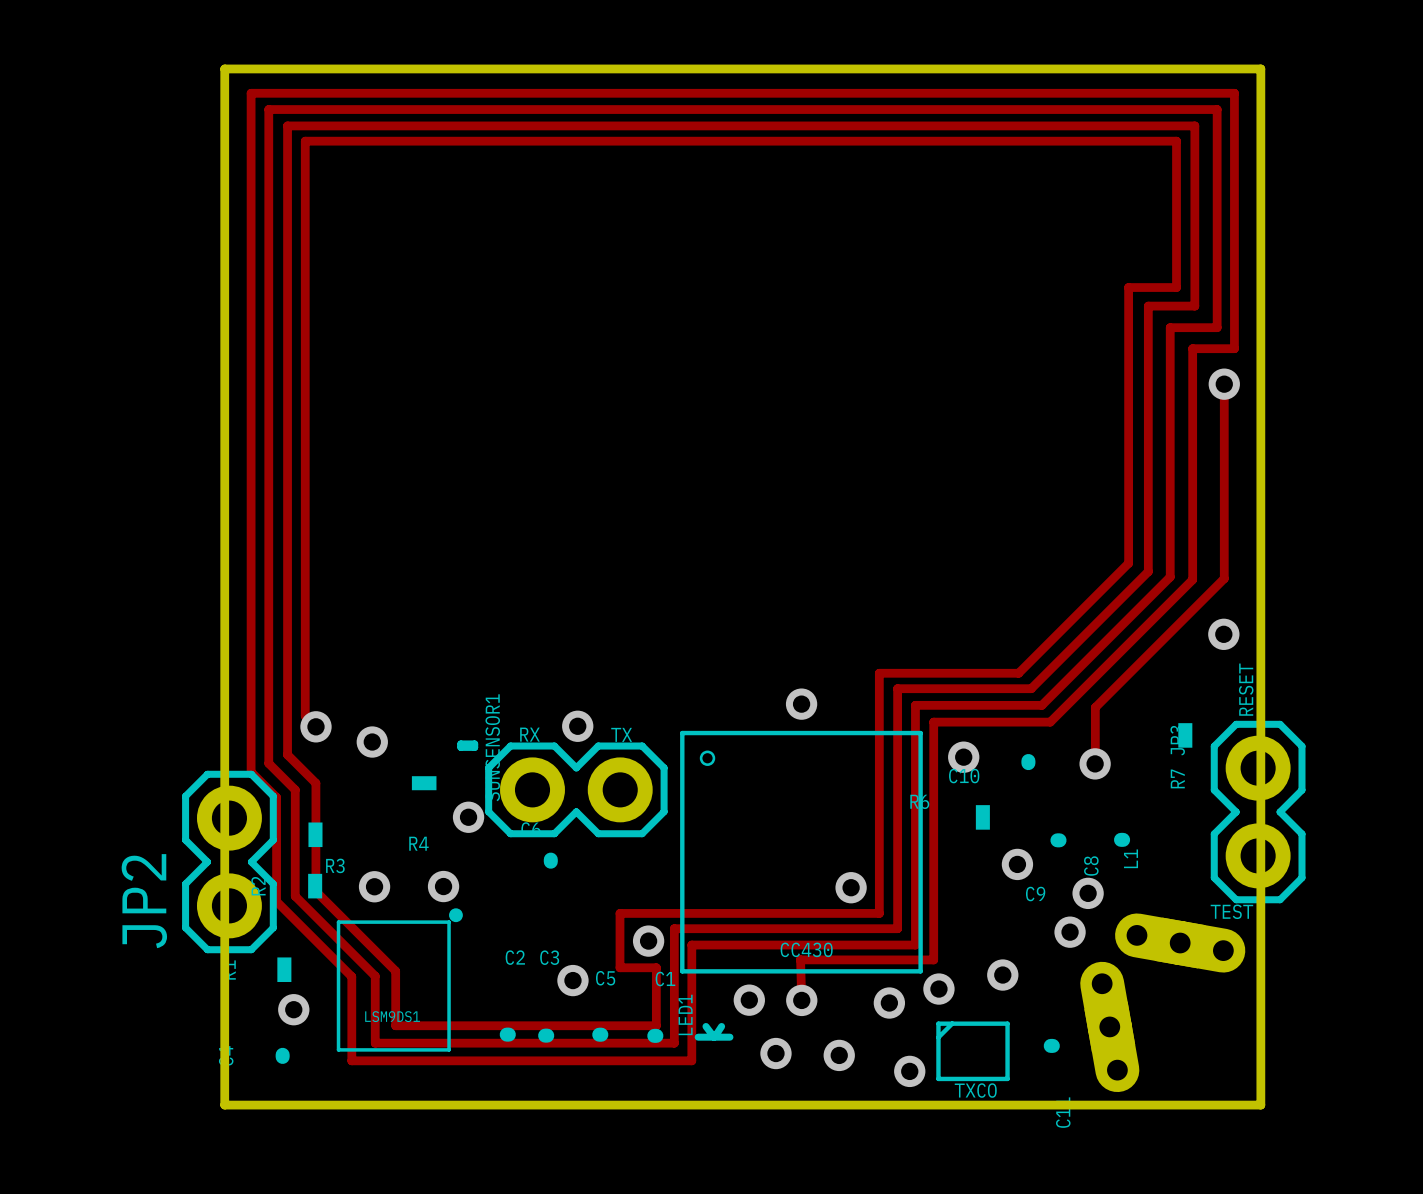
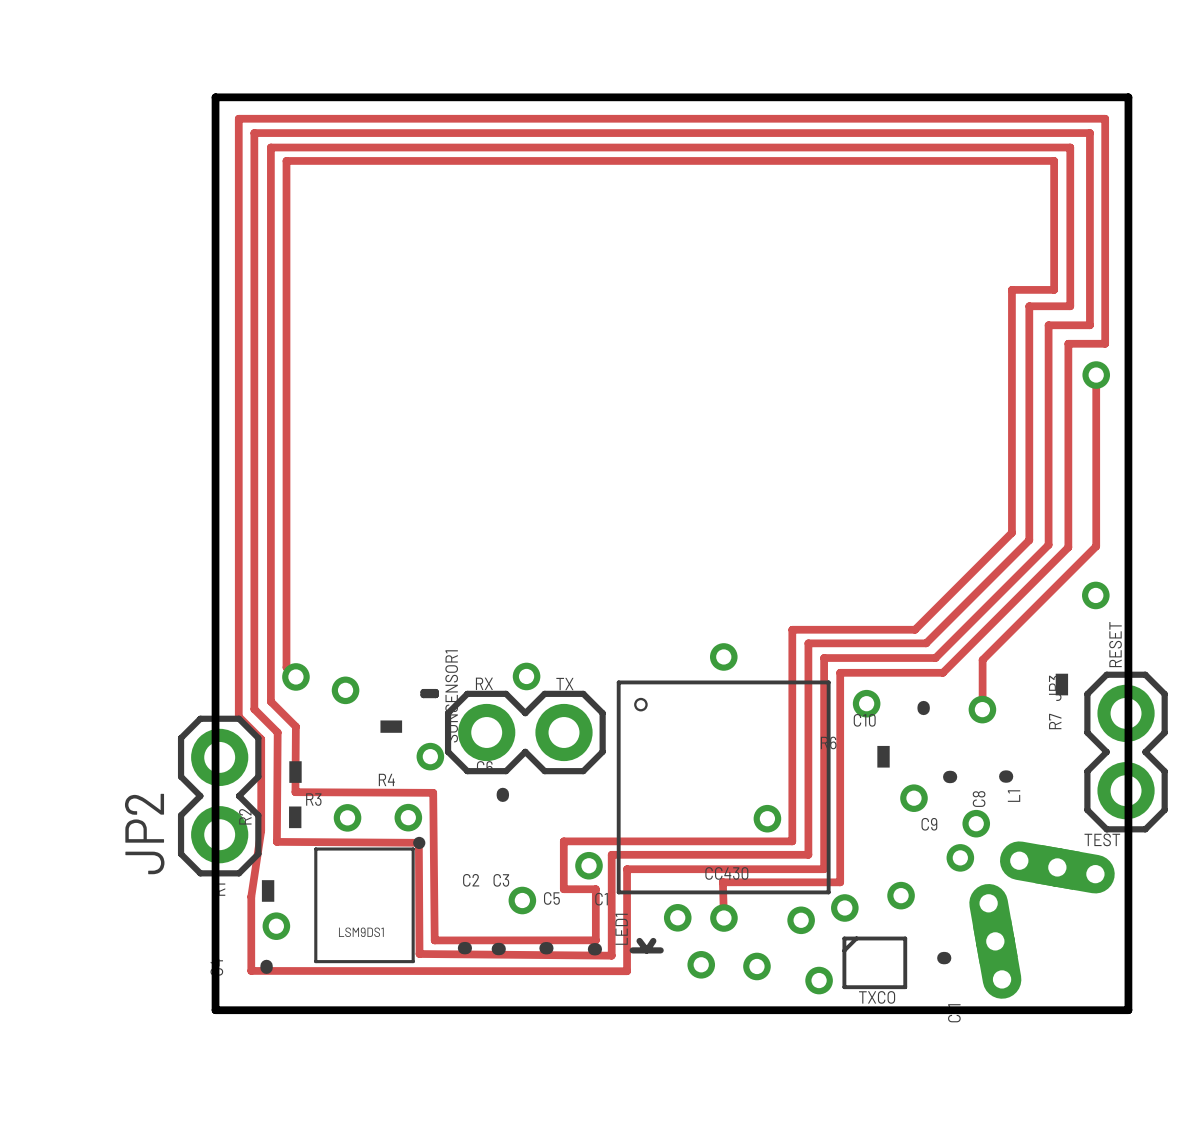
track: (315, 783) (315, 891) (395, 971) (395, 1025) (656, 1025) -> (295, 726) (295, 792) (433, 792) (434, 940) (595, 940)
track: (295, 789) (295, 896) (375, 976) (375, 1043) (674, 1043) -> (277, 732) (276, 841) (418, 842) (419, 954) (611, 955)
track: (276, 901) (351, 976) (351, 1060) (691, 1060) -> (261, 830) (251, 896) (251, 970) (627, 971)

